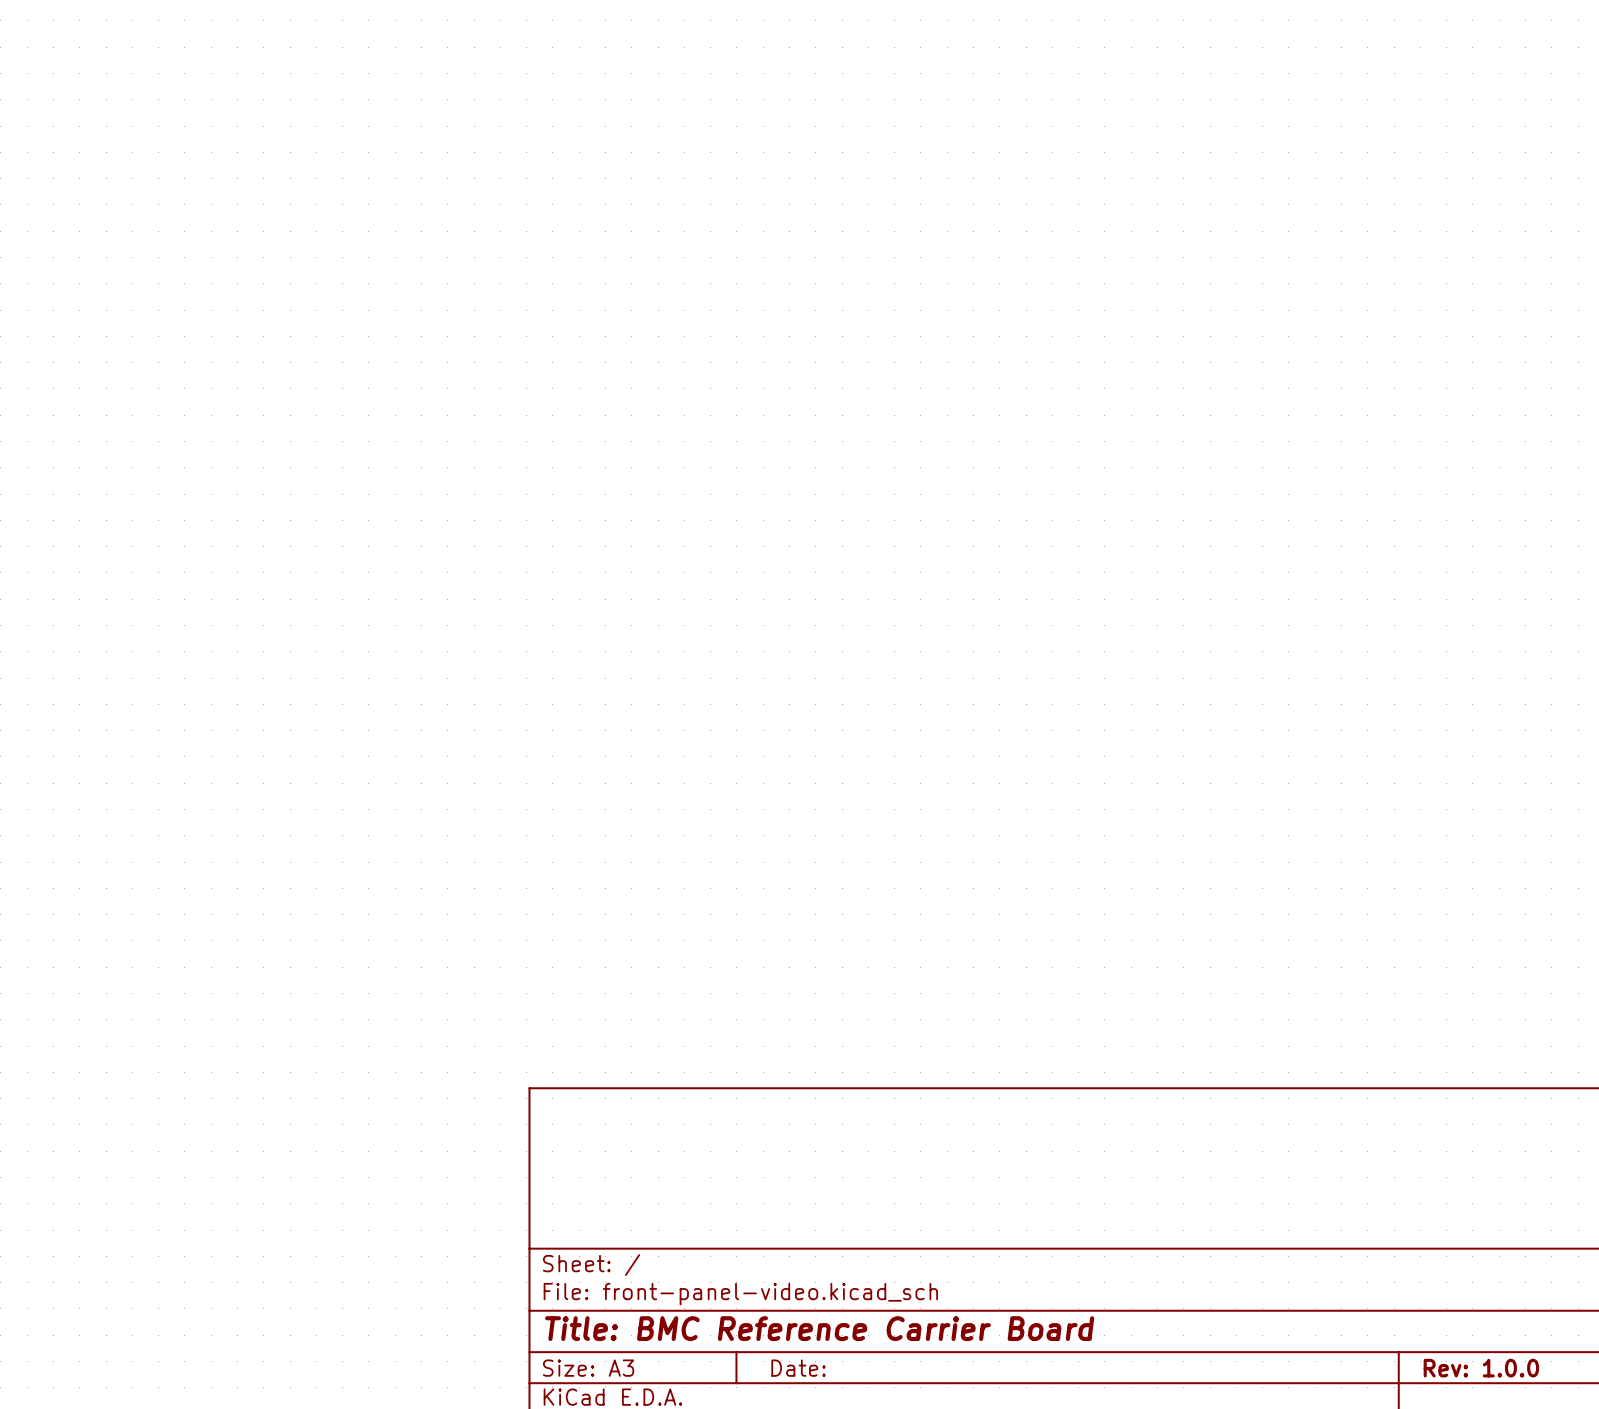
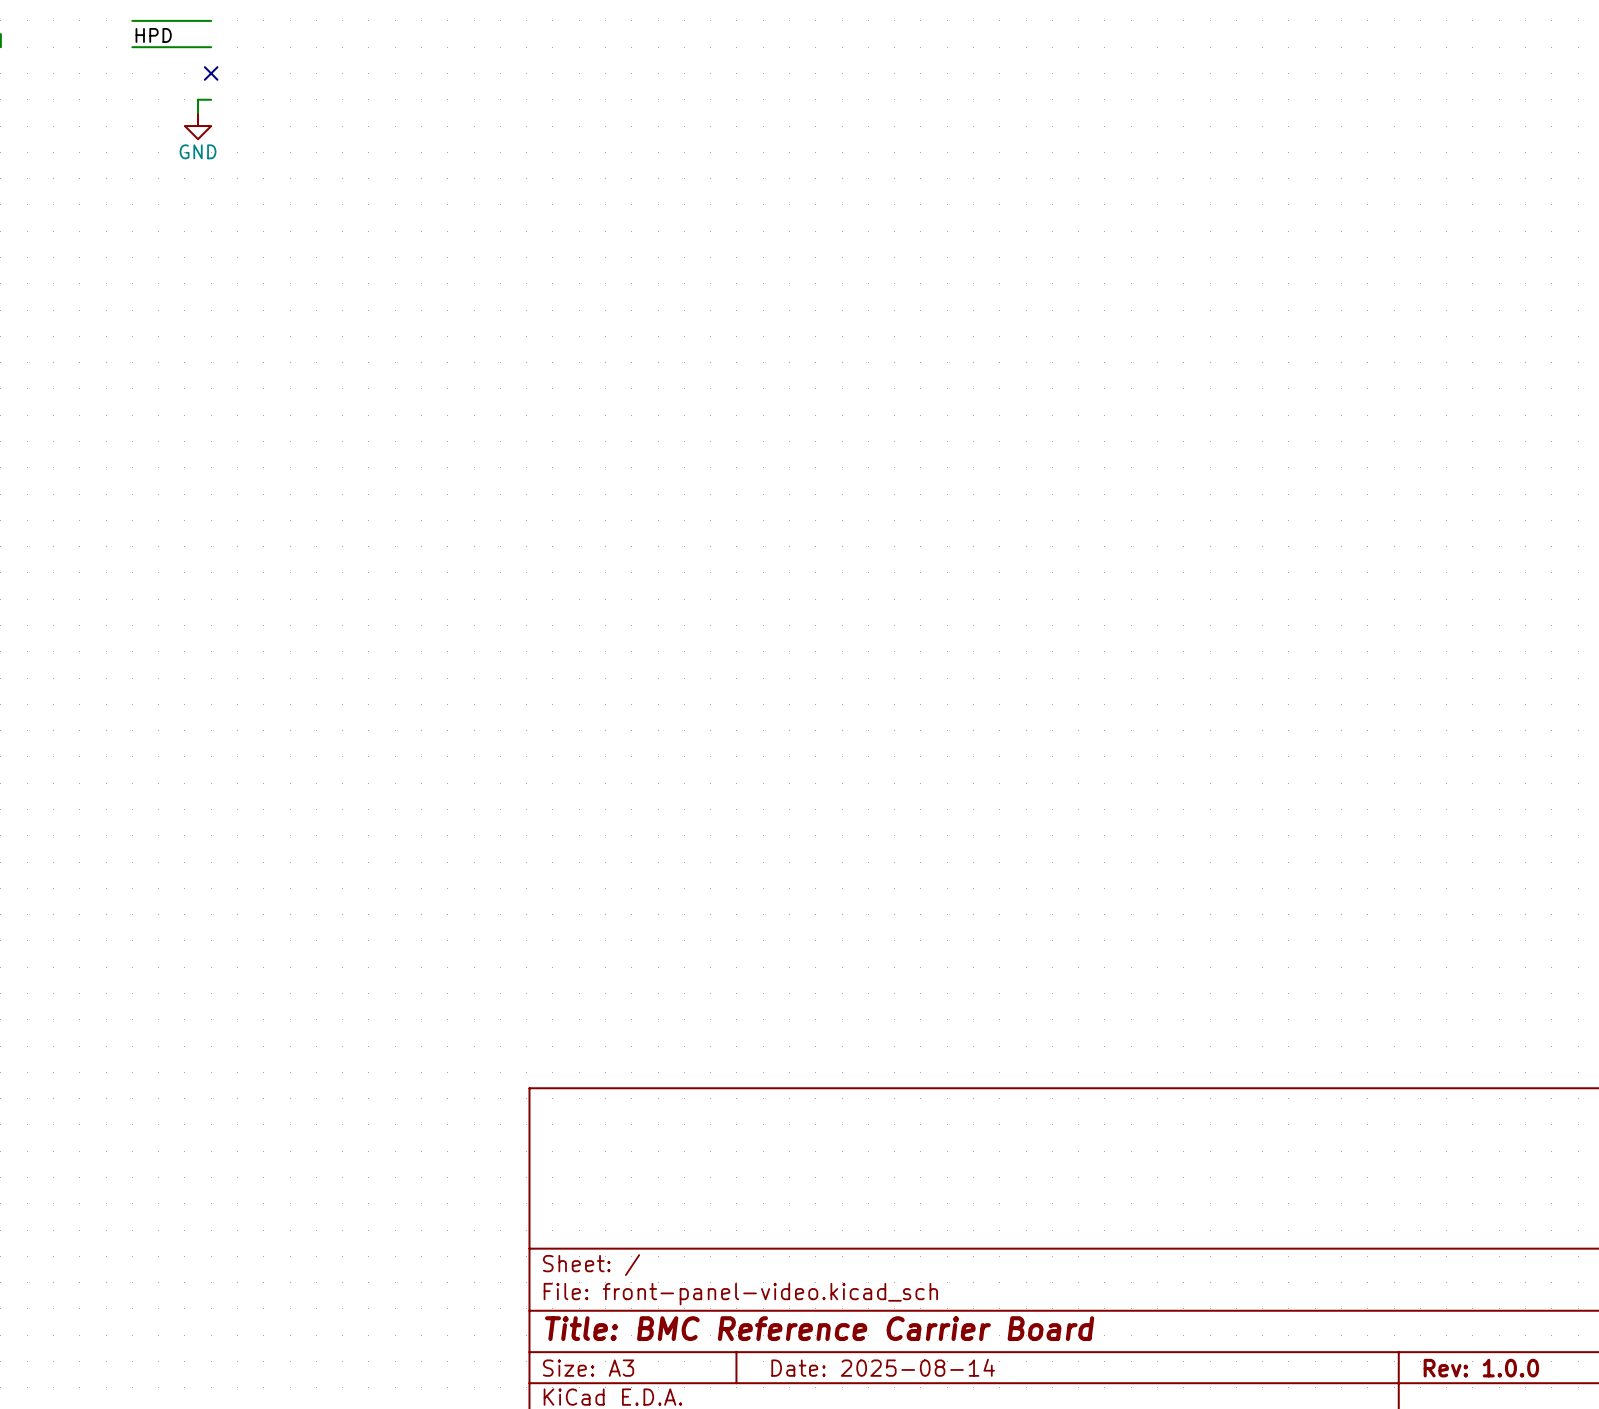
wire: none -> (132, 20) (211, 20)
wire: none -> (0, 34) (0, 47)
label: none -> HPD (153, 35)
wire: none -> (132, 47) (211, 47)
no-connect mark: none -> (211, 73)
wire: none -> (211, 99) (198, 99) (198, 112)
power symbol: none -> GND (198, 126)
title block: Date: (798, 1368) -> Date: 2025-08-14 (883, 1367)

